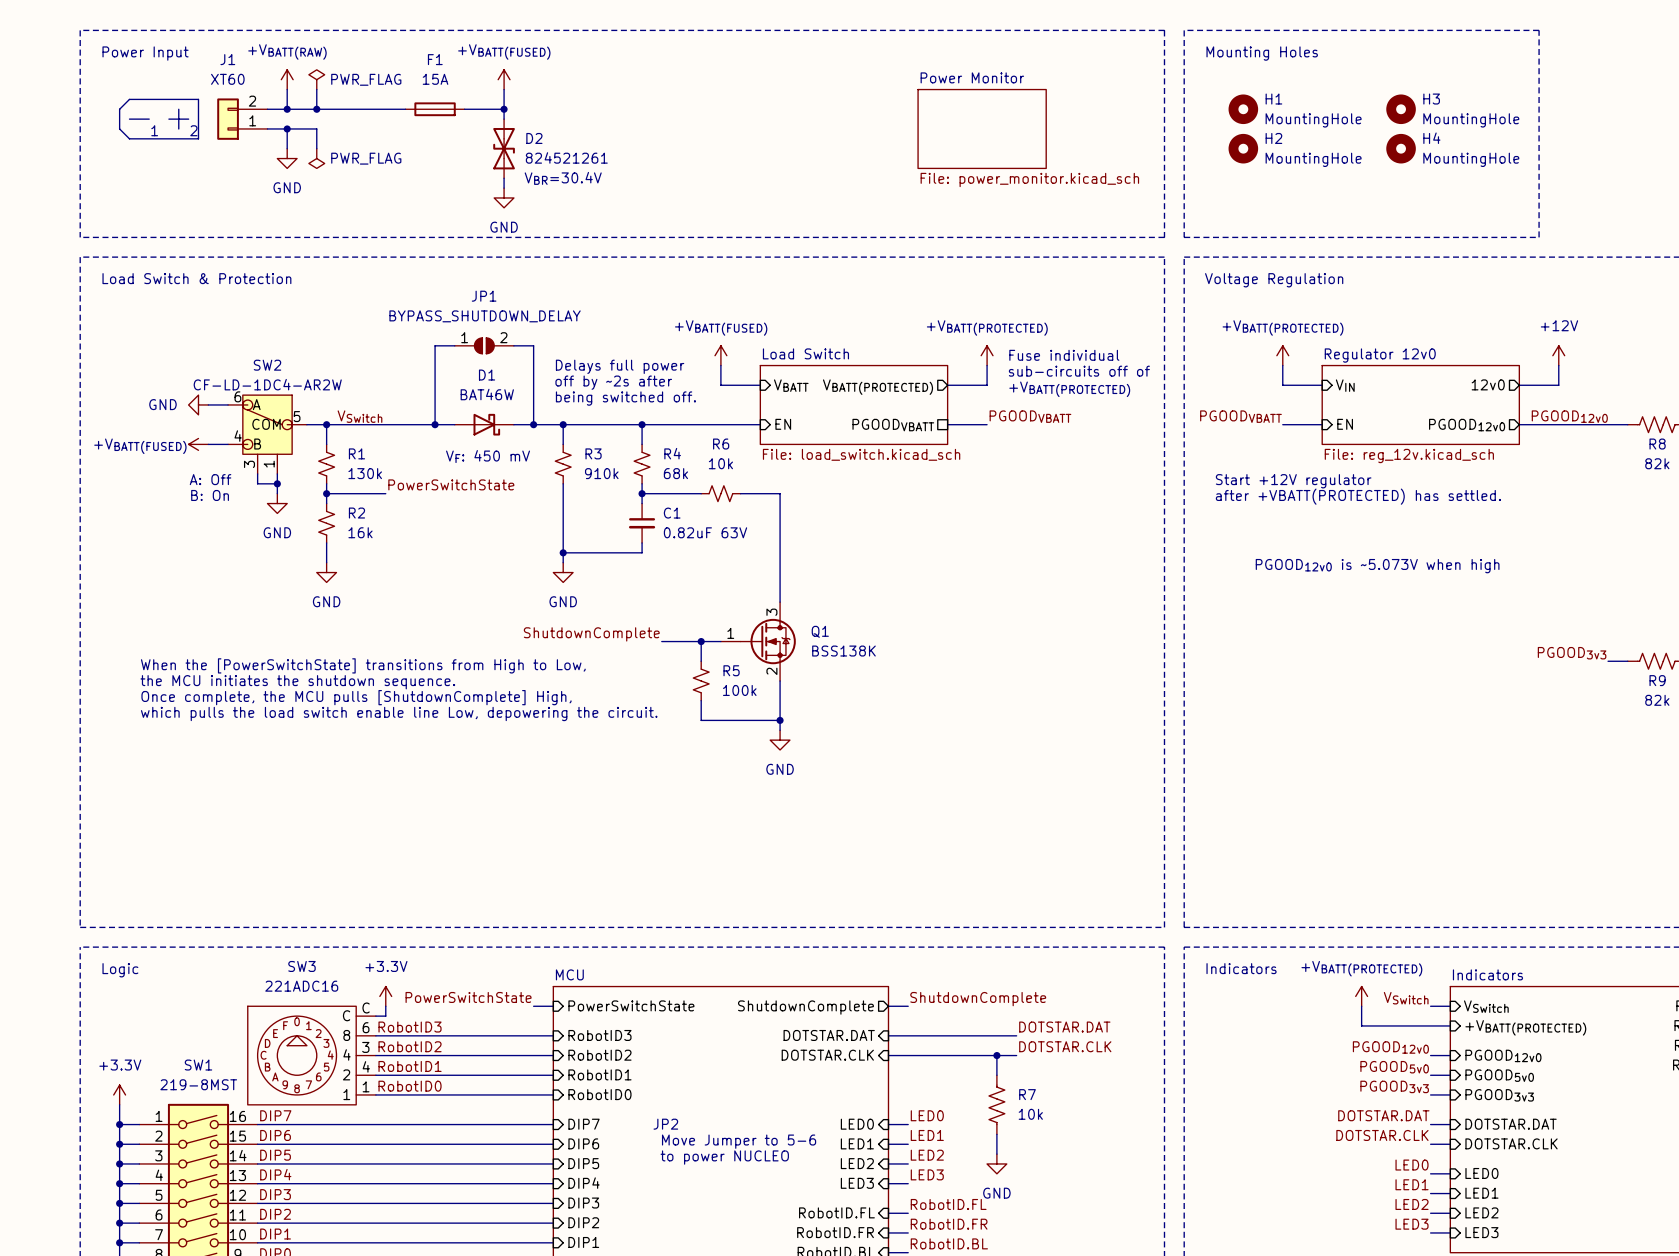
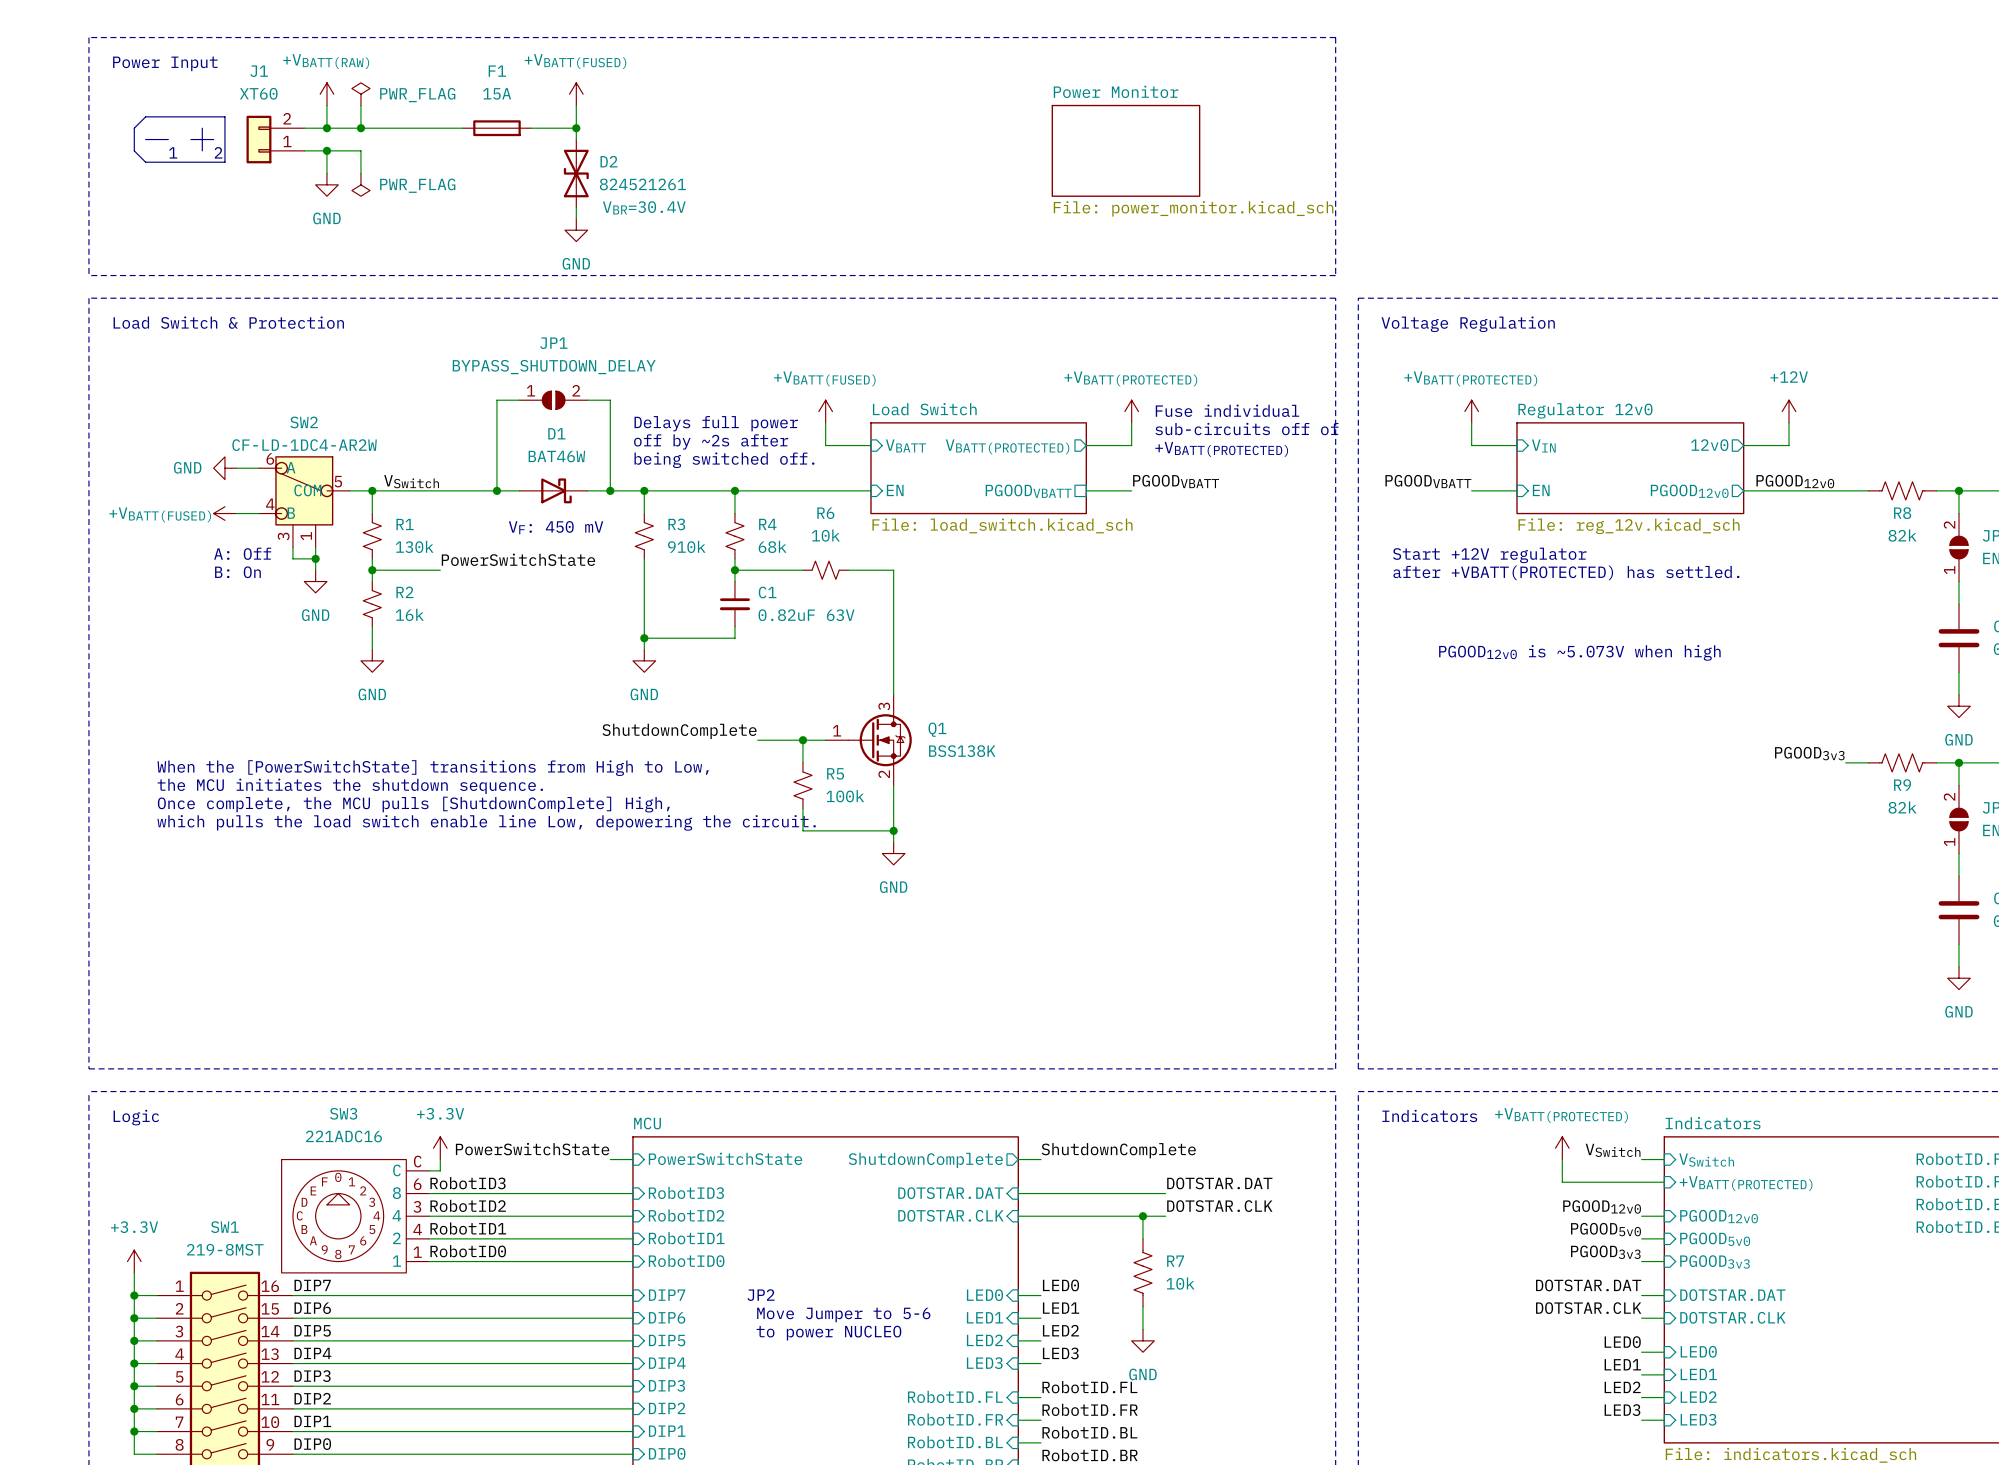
line: (1184, 30) (1539, 30) (1539, 237) (1184, 237) (1184, 30) -> none
text: Mounting Holes (1262, 53) -> none
H1: MountingHole (1243, 109) -> none
H3: MountingHole (1401, 109) -> none
H2: MountingHole (1243, 148) -> none
H4: MountingHole (1401, 148) -> none

